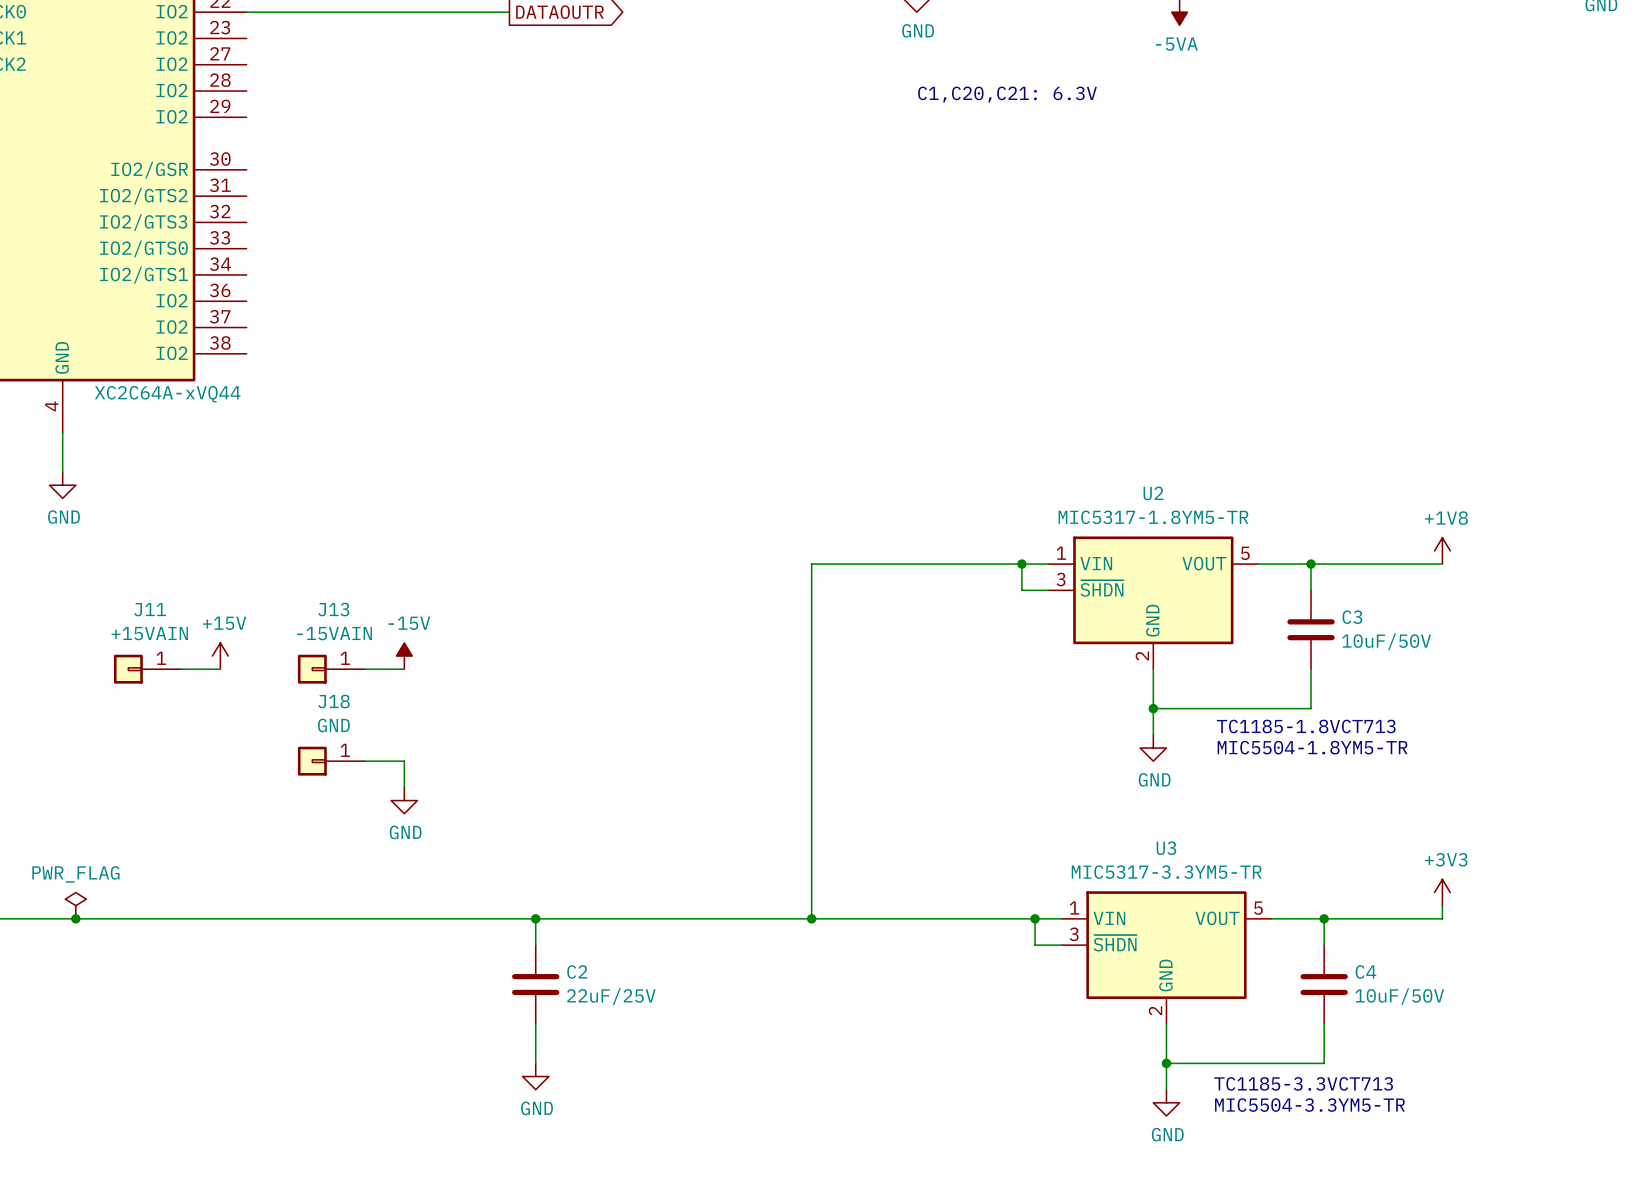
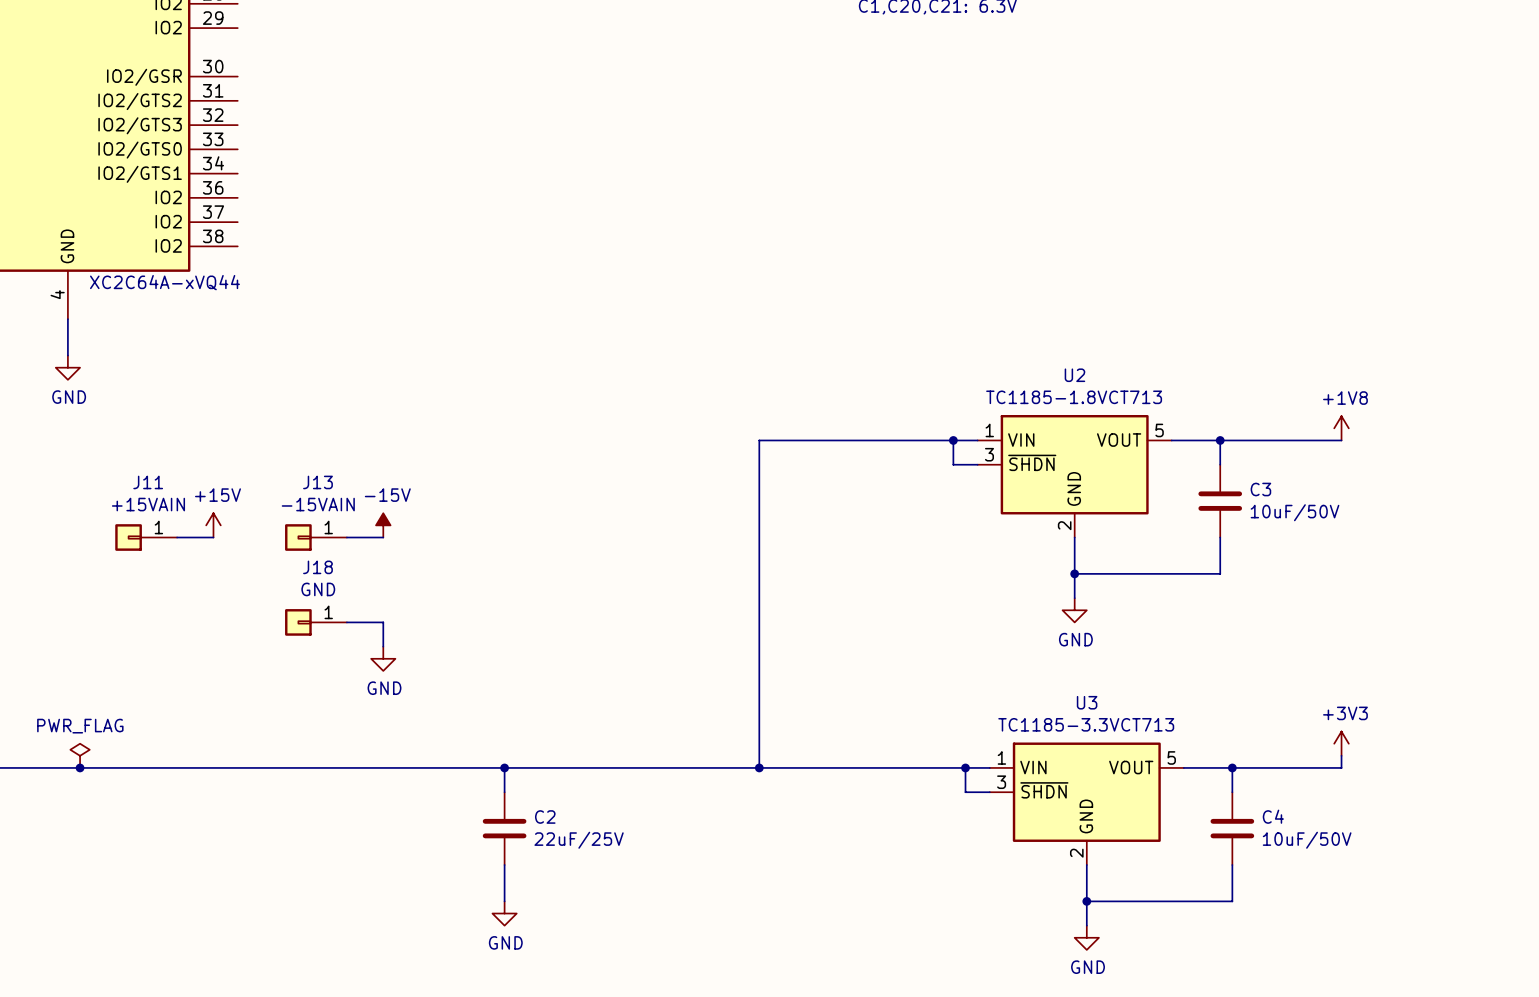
U2 value: MIC5317-1.8YM5-TR (1153, 517) -> TC1185-1.8VCT713 (1074, 397)
text: TC1185-1.8VCT713 (1306, 726) -> none
text: MIC5504-1.8YM5-TR (1312, 747) -> none
U3 value: MIC5317-3.3YM5-TR (1166, 872) -> TC1185-3.3VCT713 (1086, 724)
text: TC1185-3.3VCT713 (1303, 1083) -> none
text: MIC5504-3.3YM5-TR (1309, 1105) -> none

